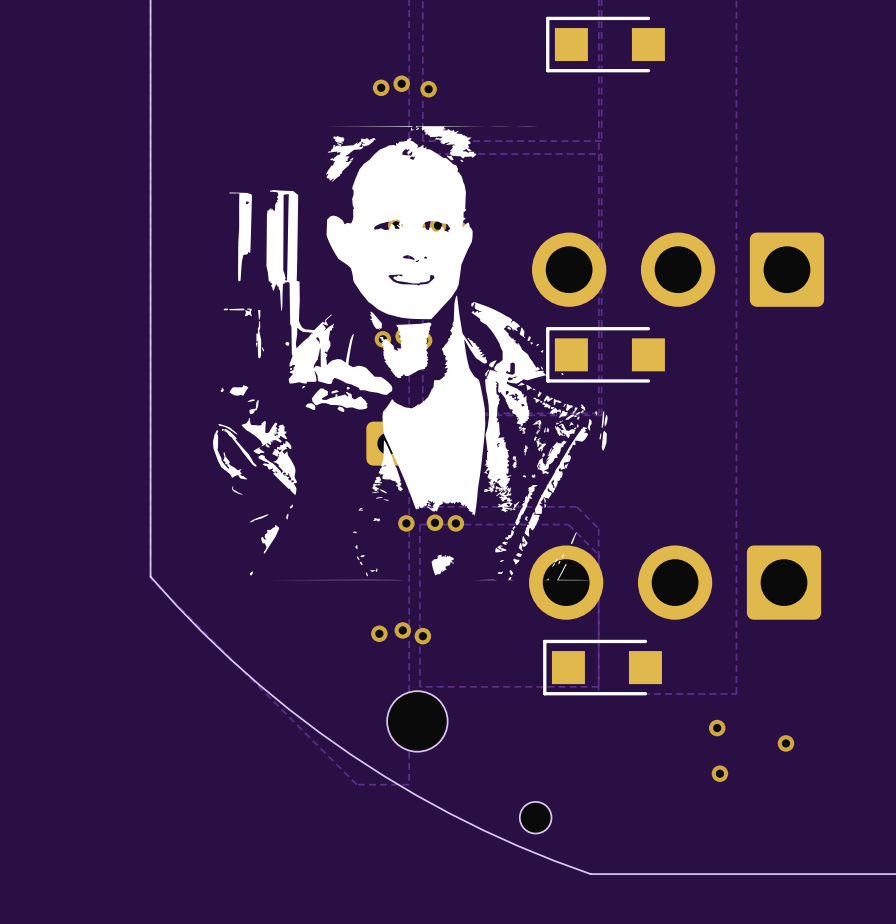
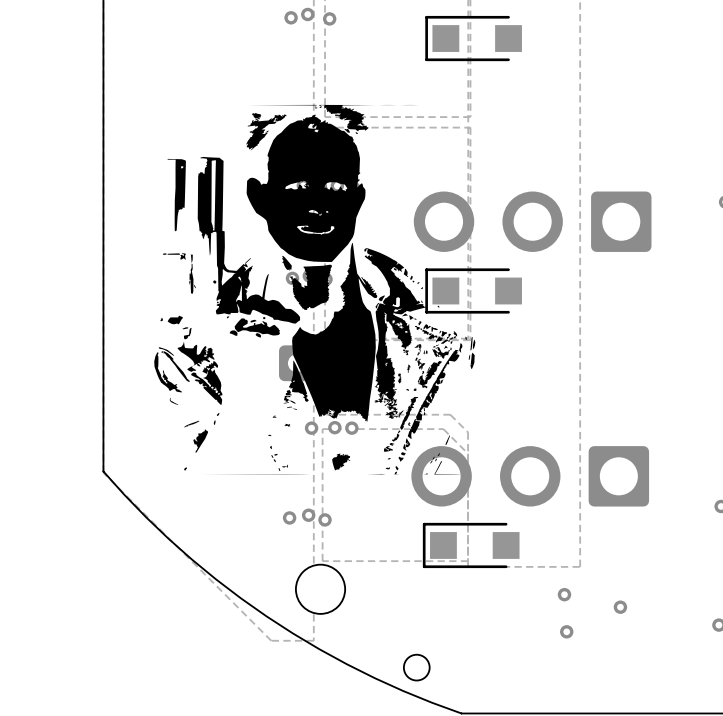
via: none -> (307, 14)
via: none -> (291, 17)
via: none -> (329, 18)
via: (401, 83) -> none
via: (381, 87) -> none
via: (428, 89) -> none

